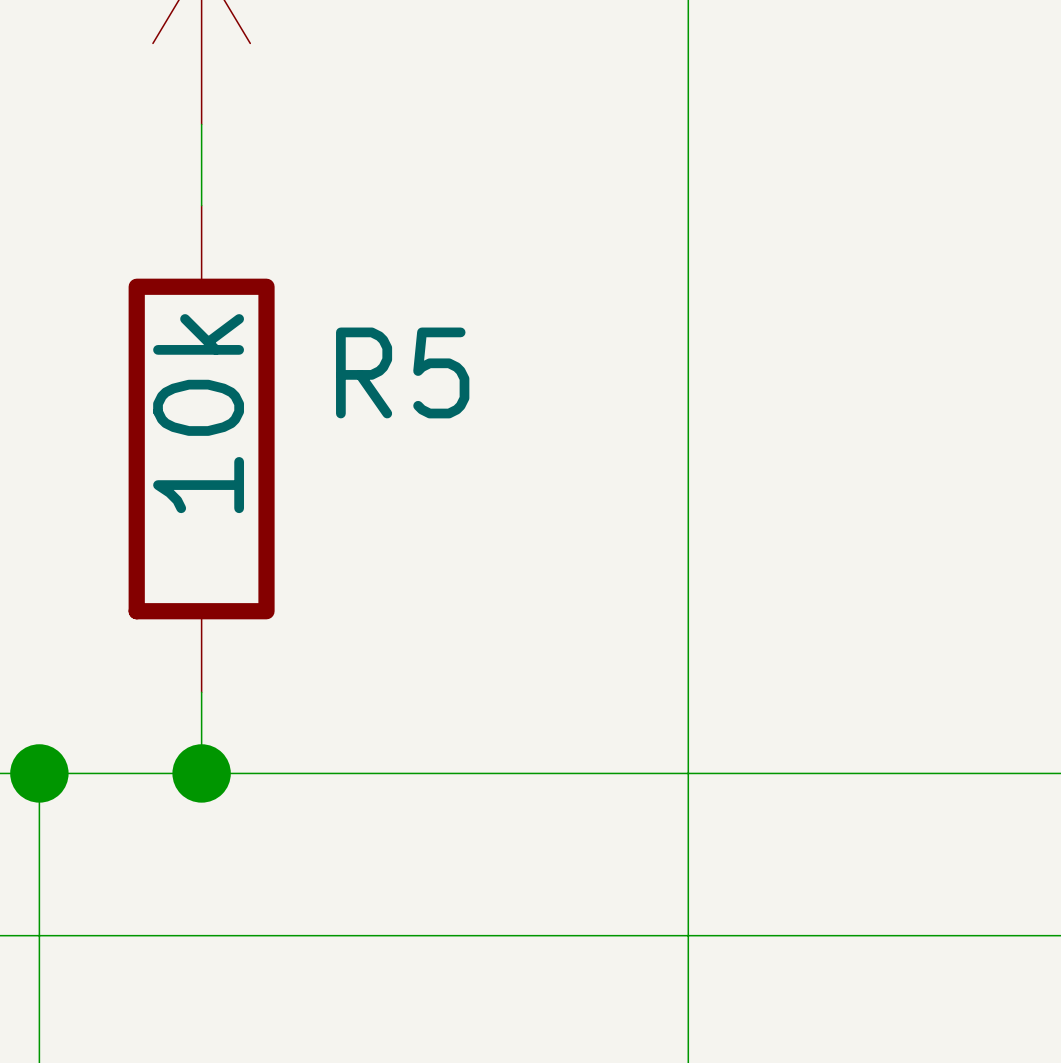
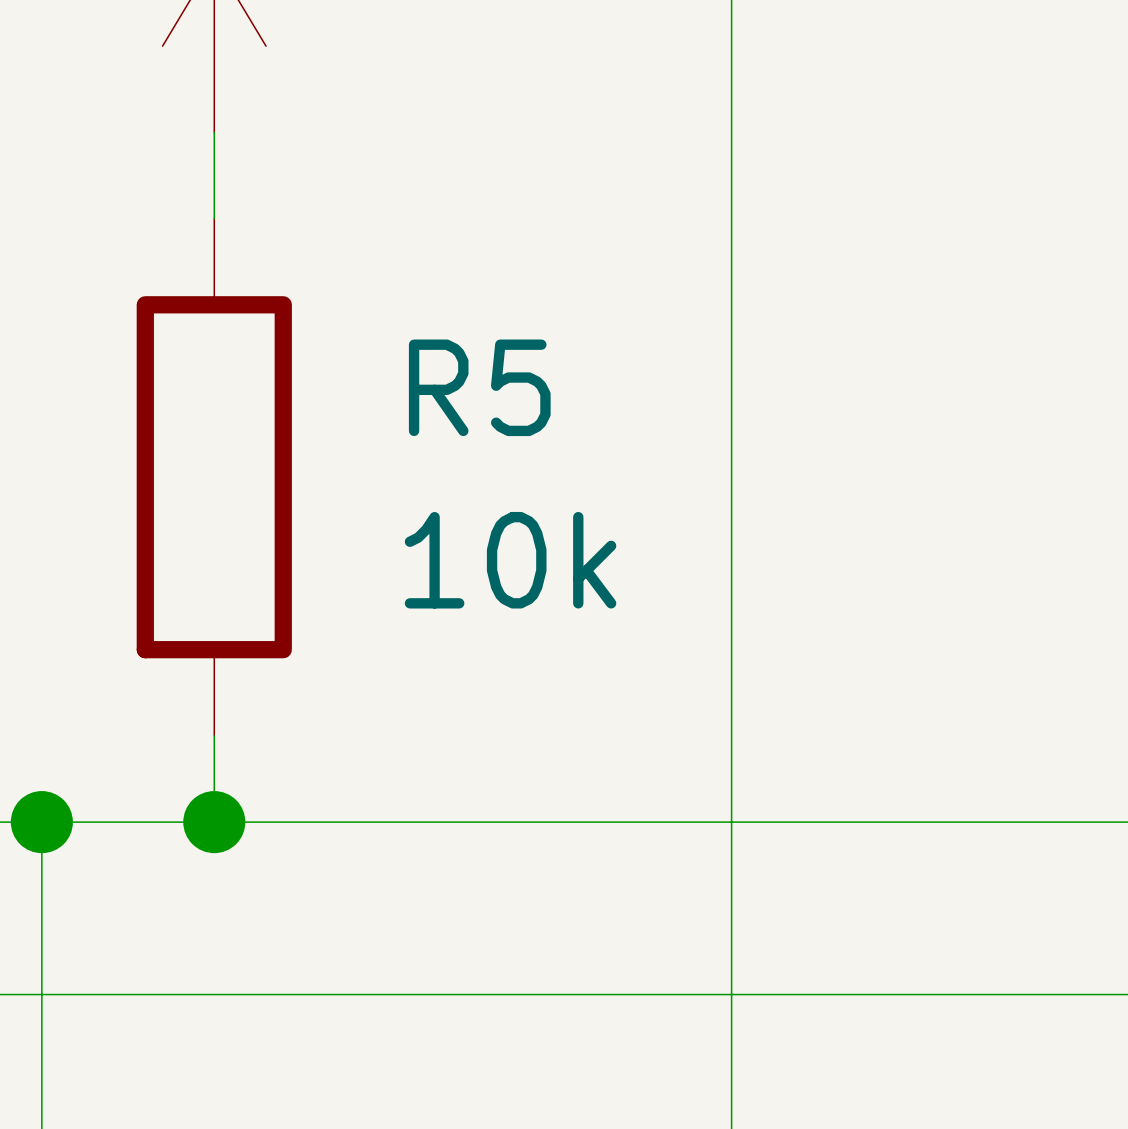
R5 name position: R5 (402, 372) -> R5 (479, 387)
R5 value rotation: 0° (198, 413) -> 90° clockwise (510, 560)
R5 value position: 10k (198, 413) -> 10k (510, 560)

